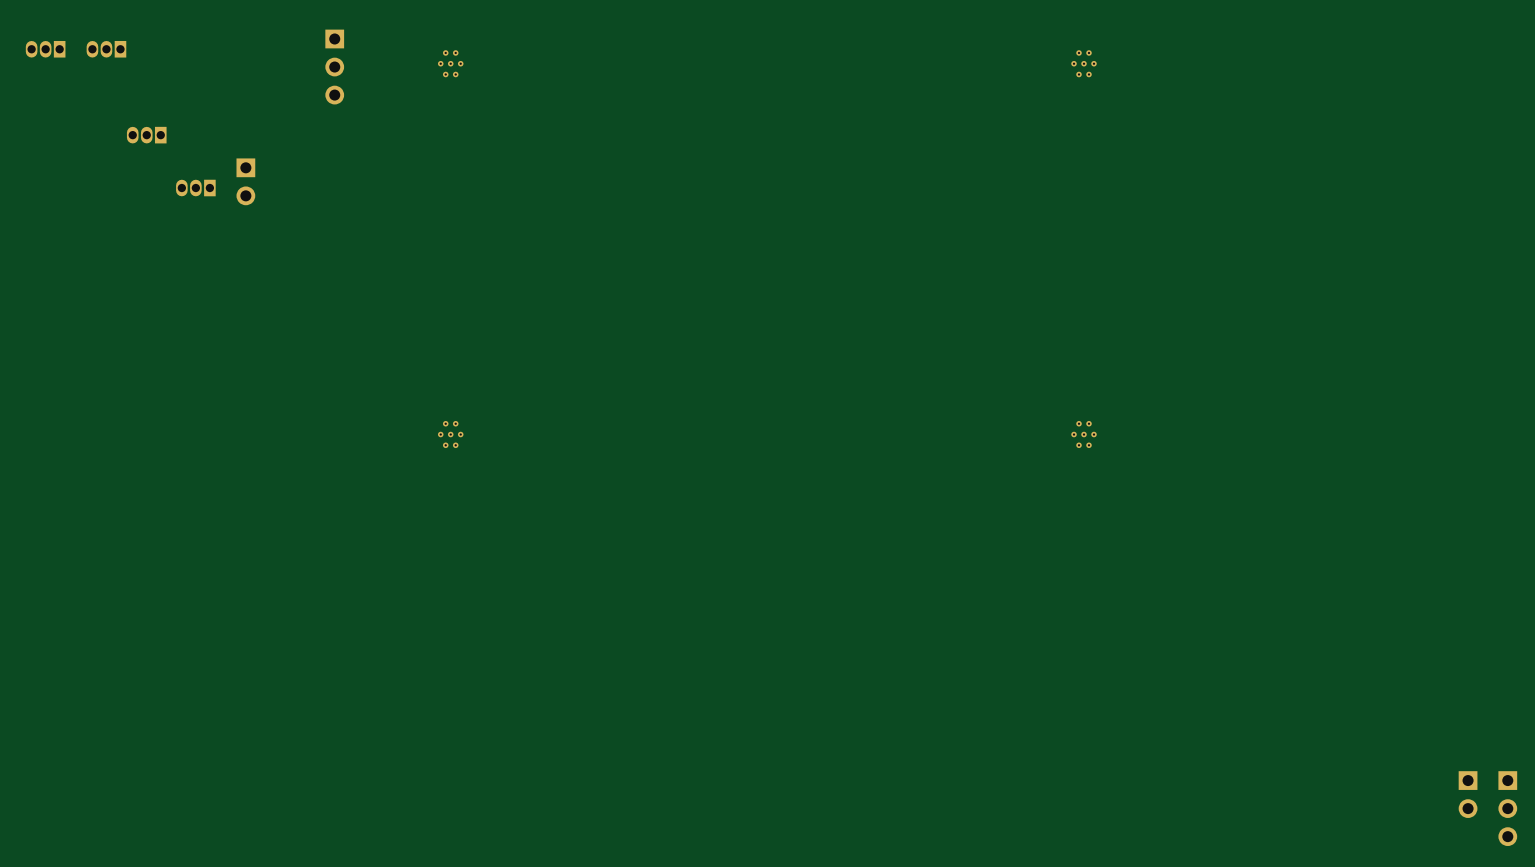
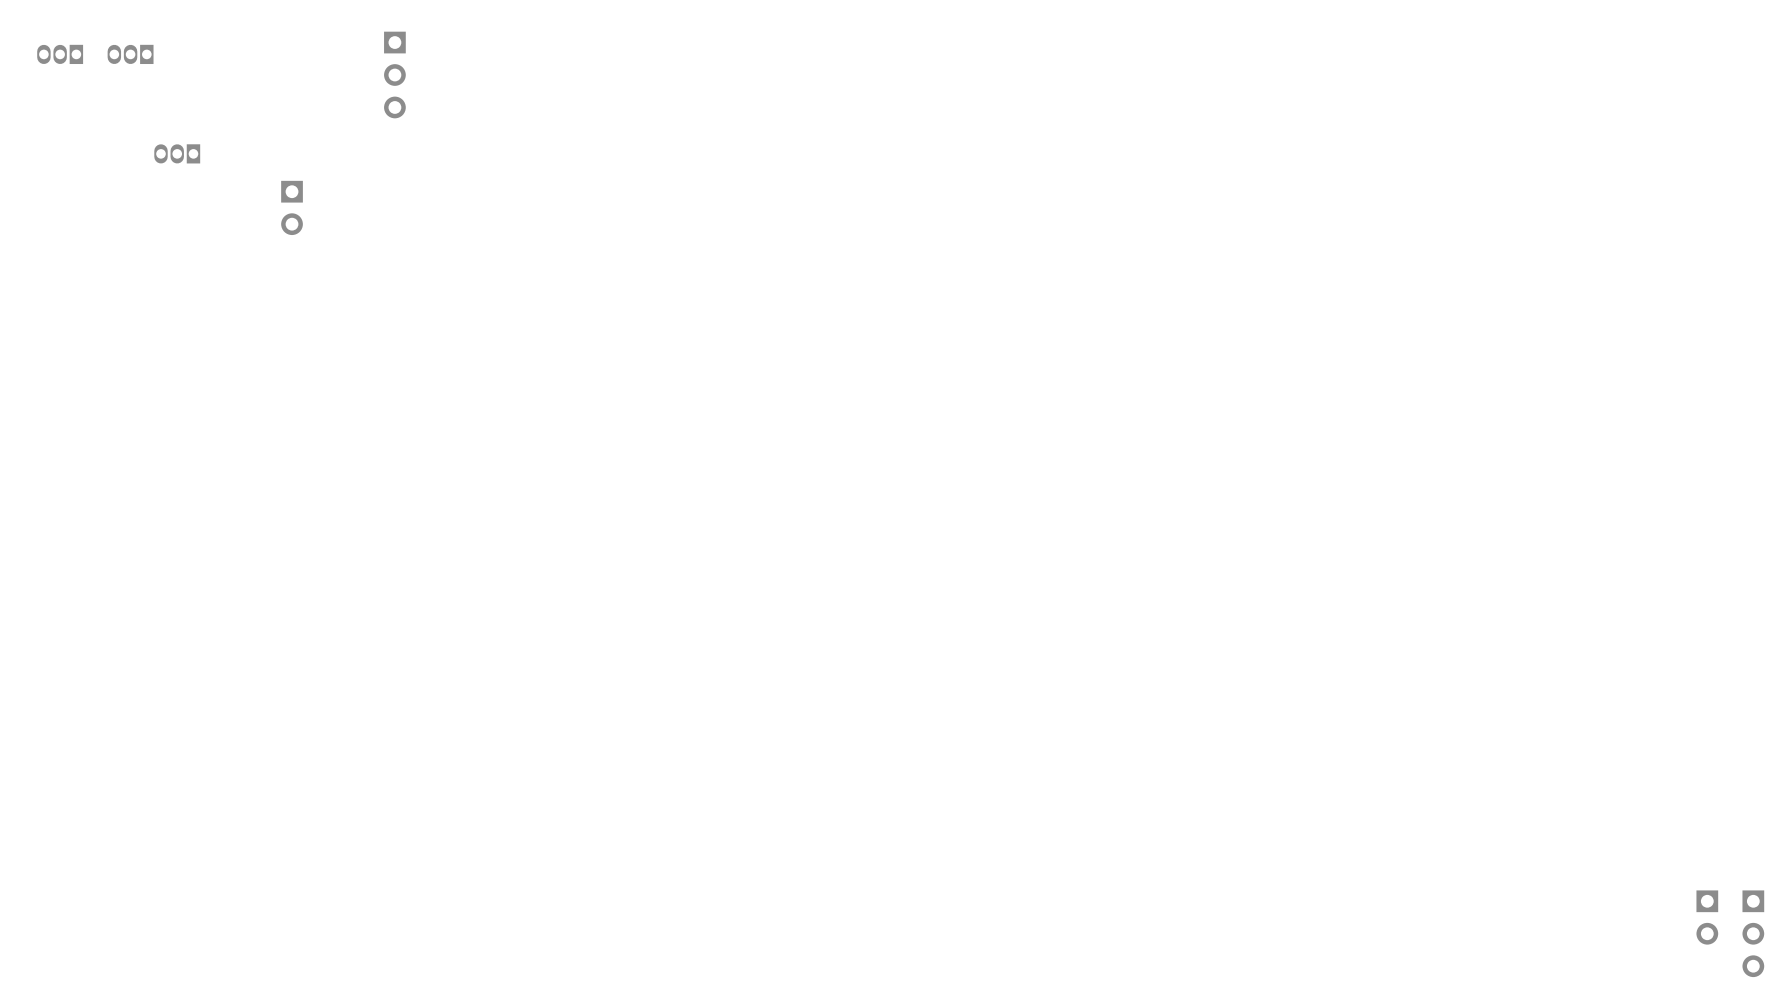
part: (450, 63) -> none
part: (1084, 63) -> none
part: (195, 188) -> none
part: (450, 434) -> none
part: (1084, 434) -> none

